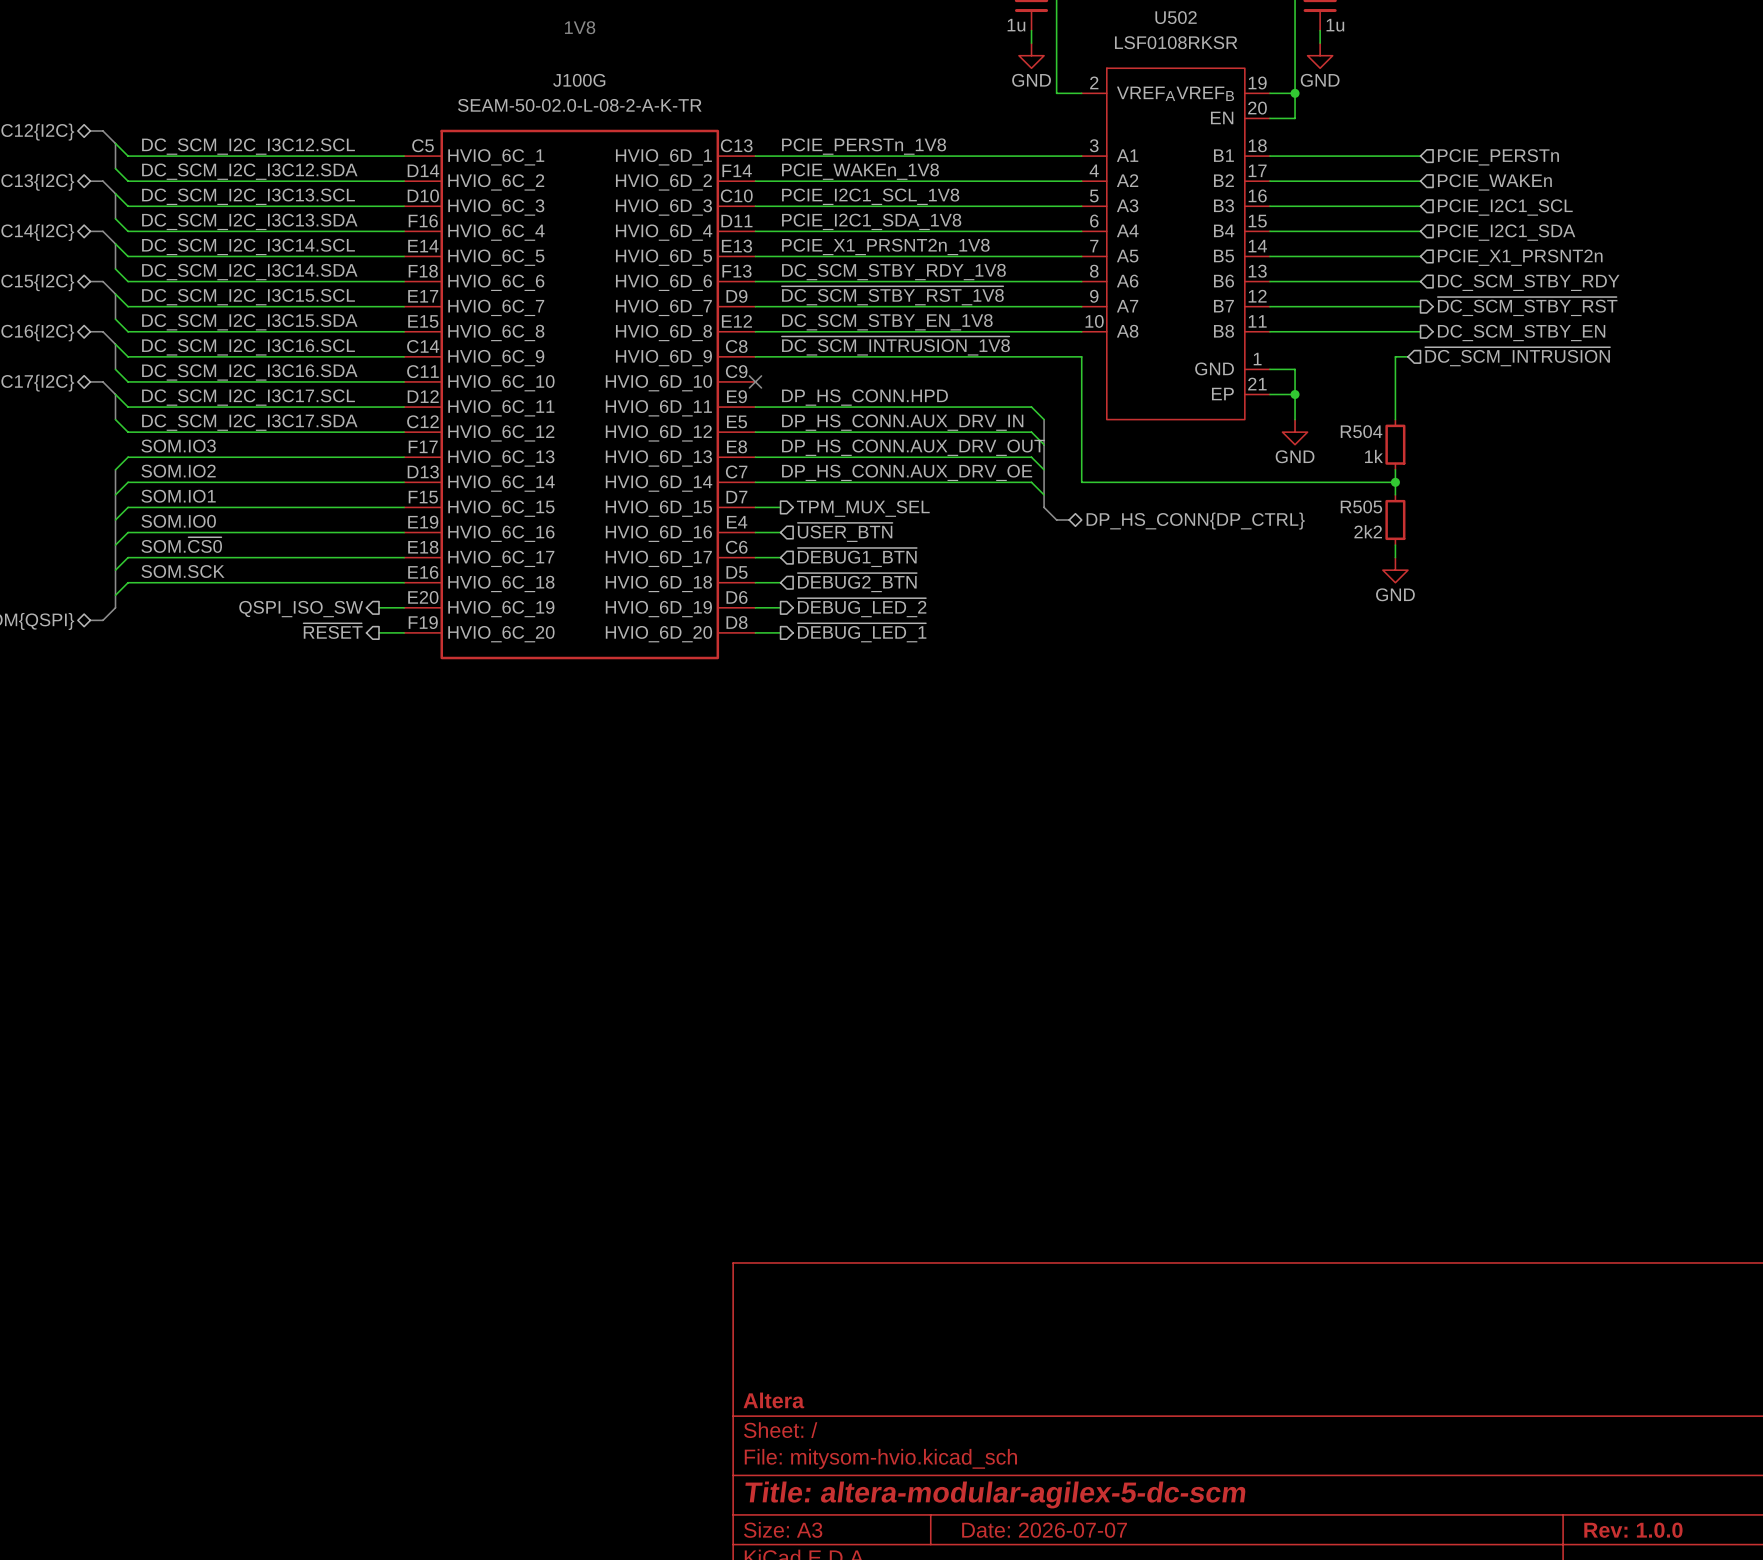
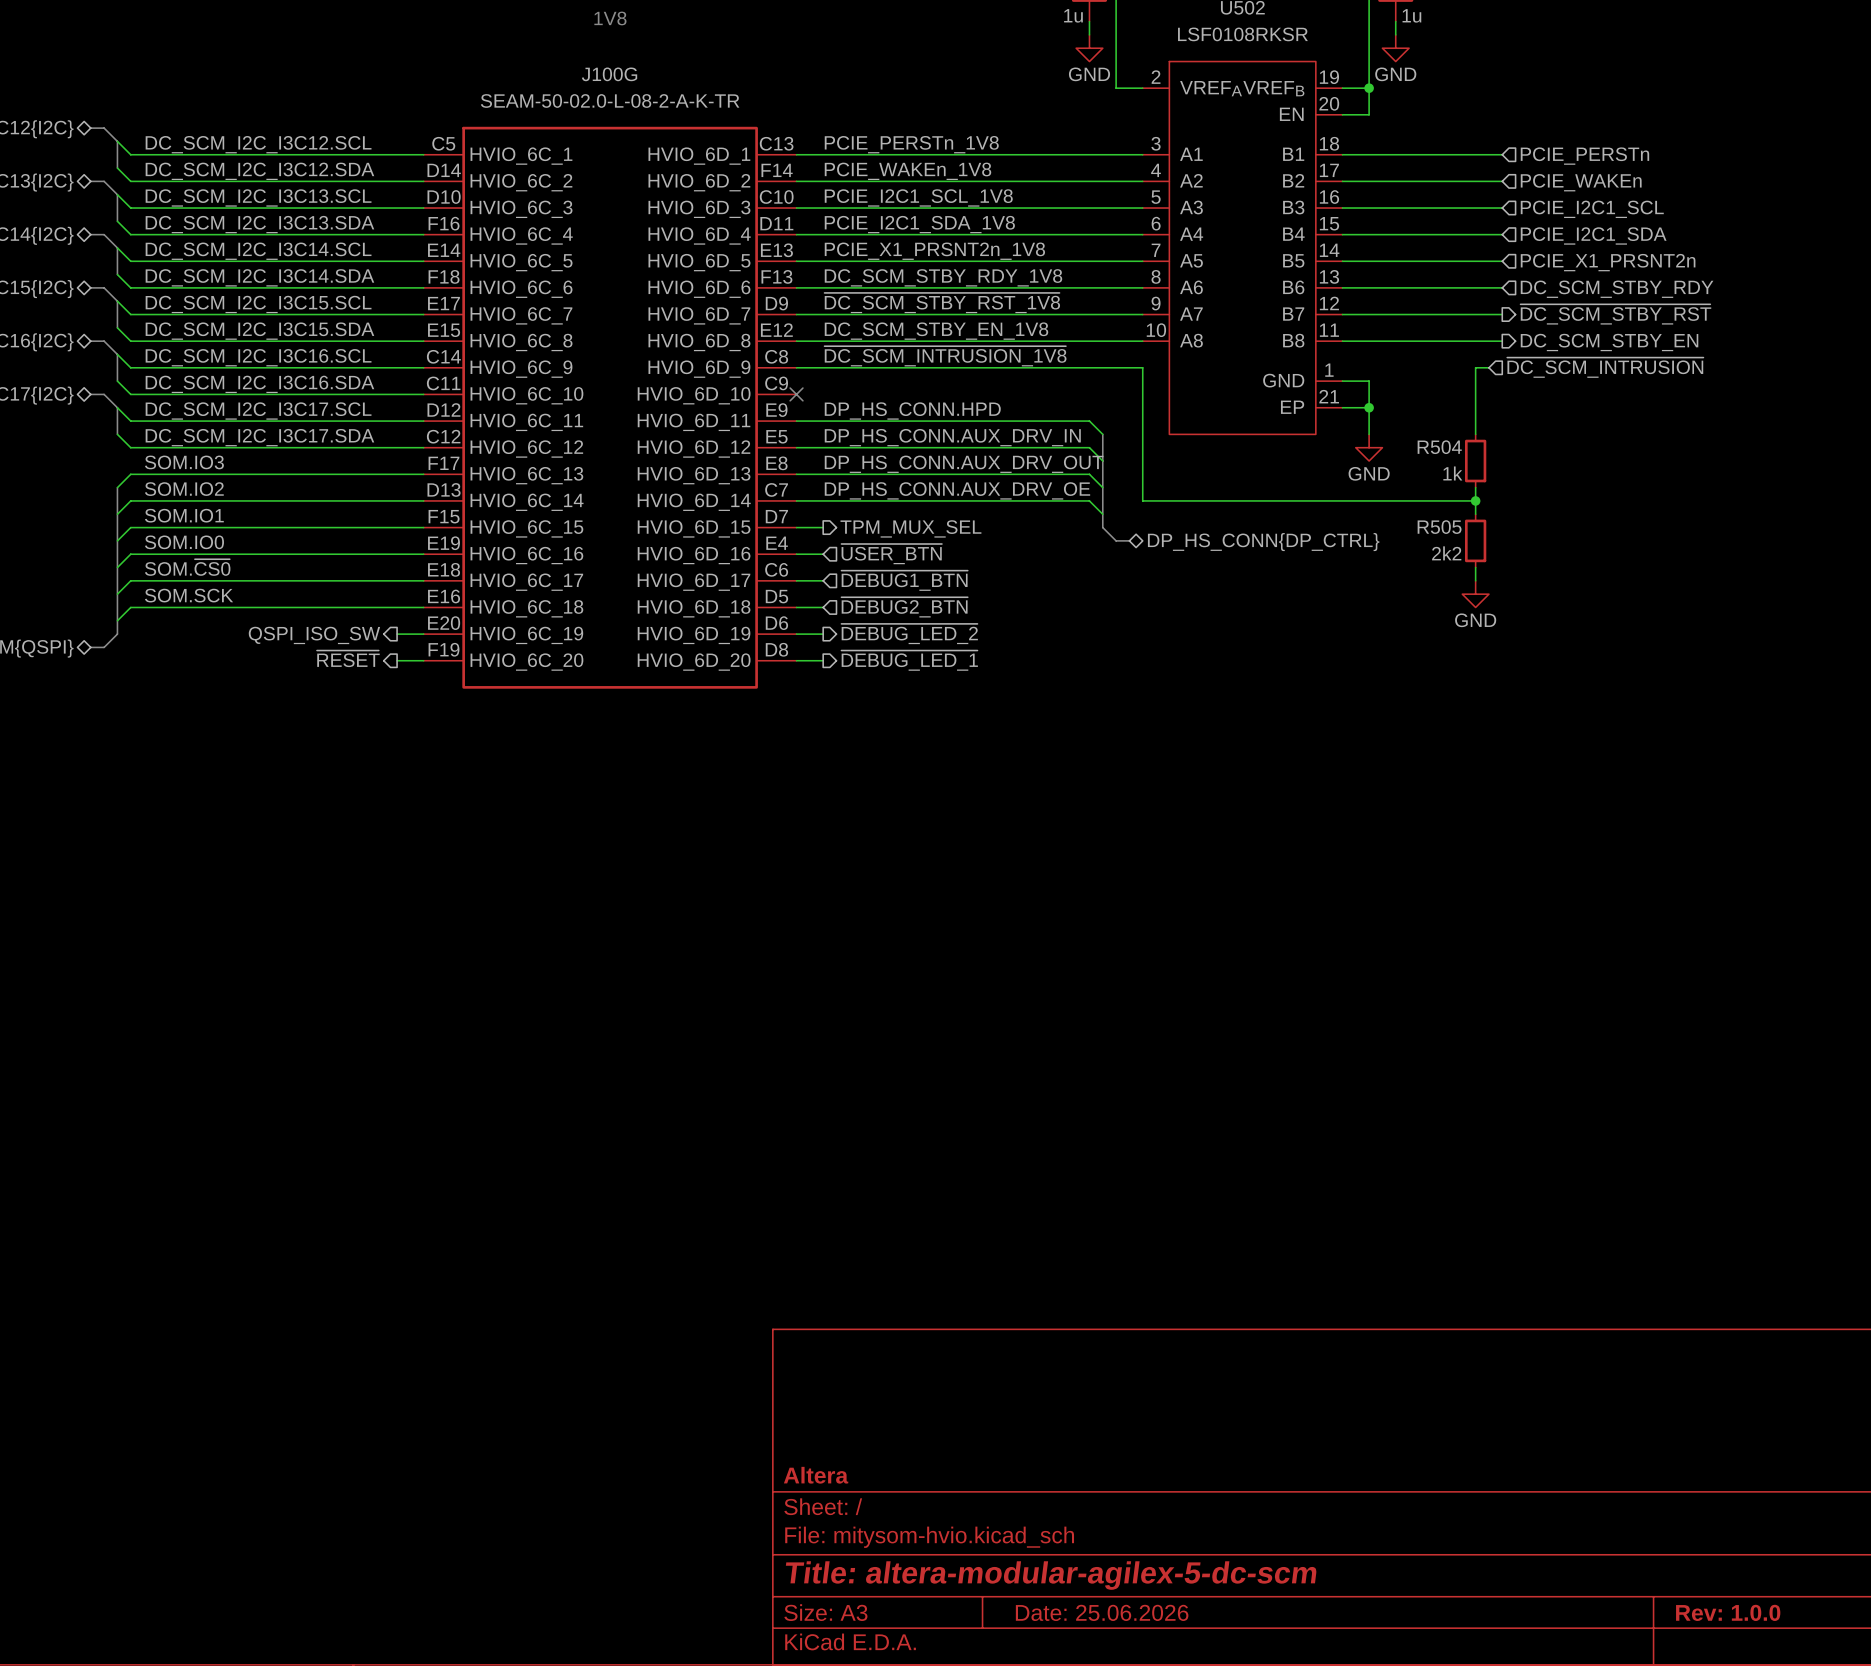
title block: Date: 2026-07-07 (1044, 1530) -> Date: 25.06.2026 (1102, 1612)

